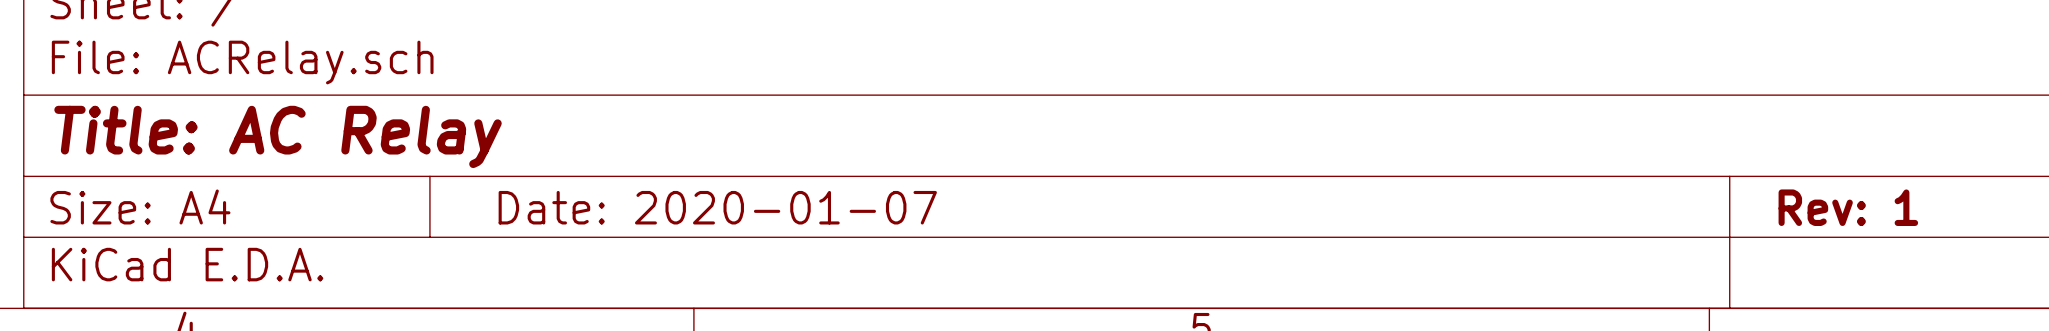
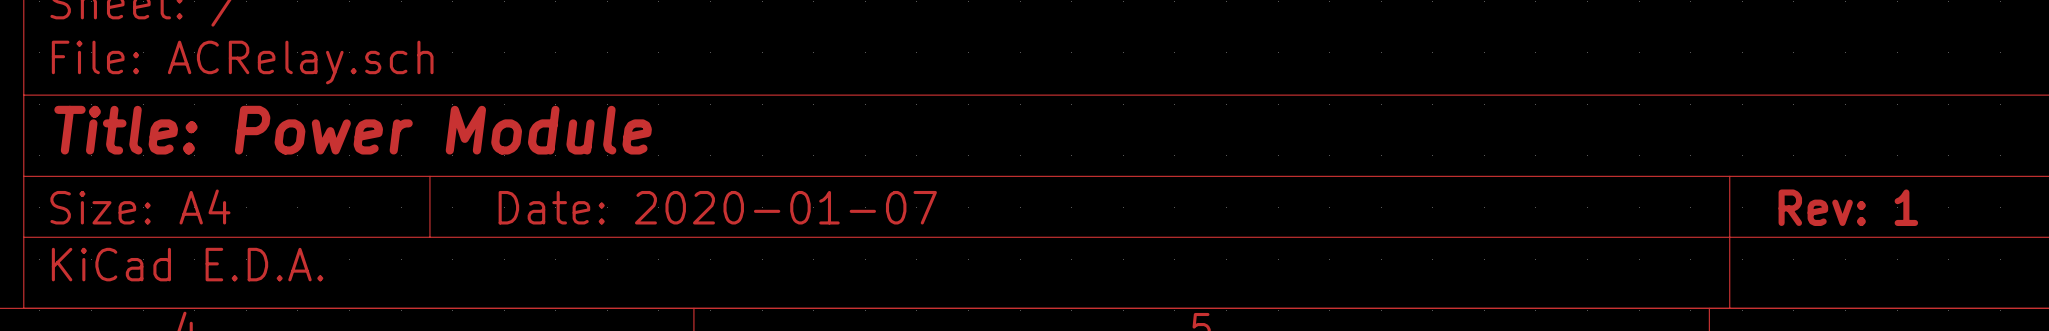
title block: Title: AC Relay (278, 136) -> Title: Power Module (353, 130)

